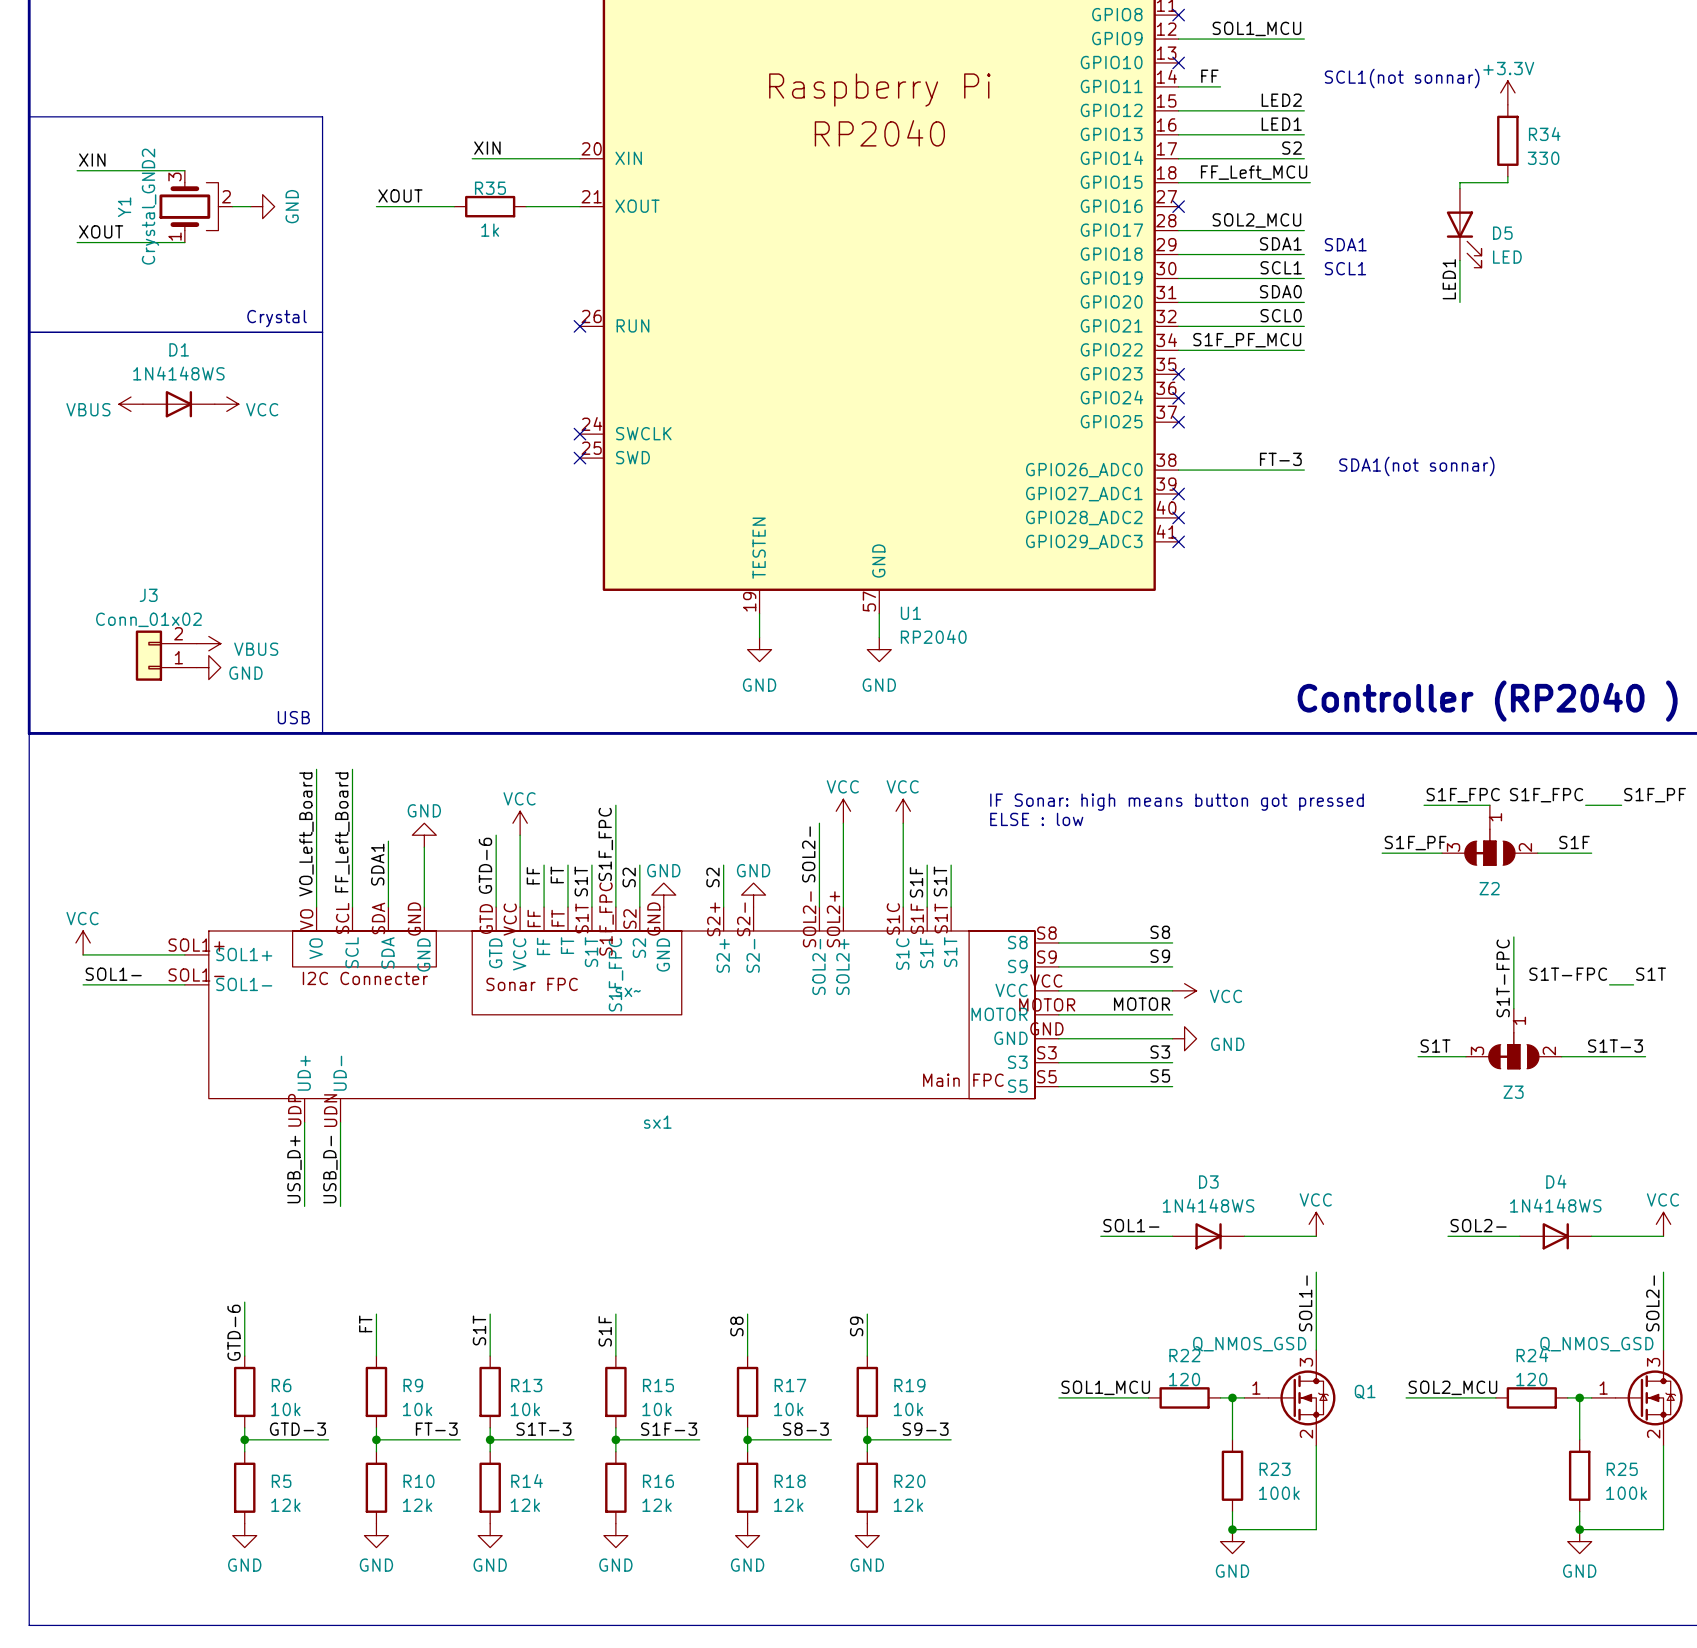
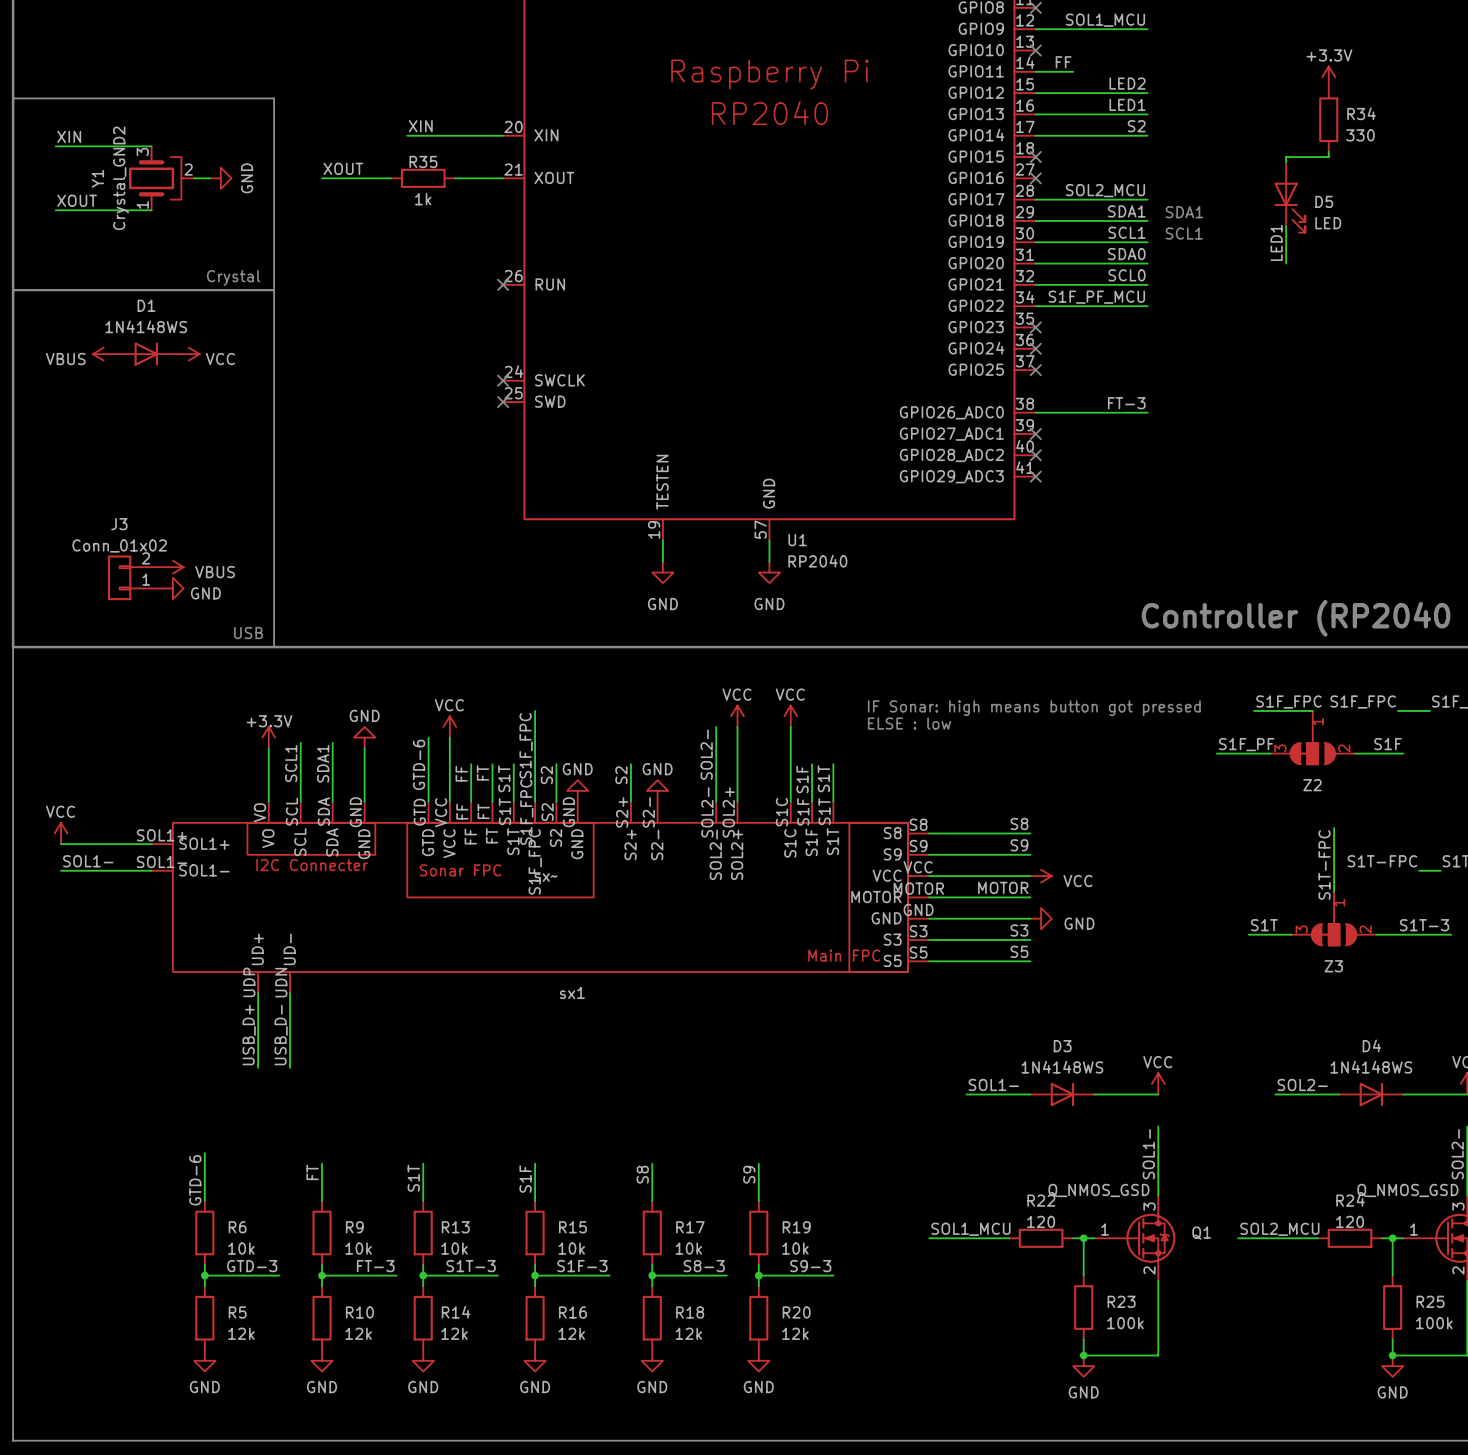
text: SCL1(not sonnar) (1402, 78) -> none
label: FF_Left_MCU (1254, 172) -> none
wire: (1178, 182) (1310, 182) -> none
no-connect mark: none -> (1035, 157)
text: SDA1(not sonnar) (1416, 466) -> none
wire: (316, 769) (316, 847) -> none
wire: (352, 769) (352, 841) -> none
label: FF_Left_Board (342, 832) -> none
label: VO_Left_Board (306, 834) -> none
power symbol: none -> +3.3V (268, 737)
label: none -> SCL1 (291, 763)

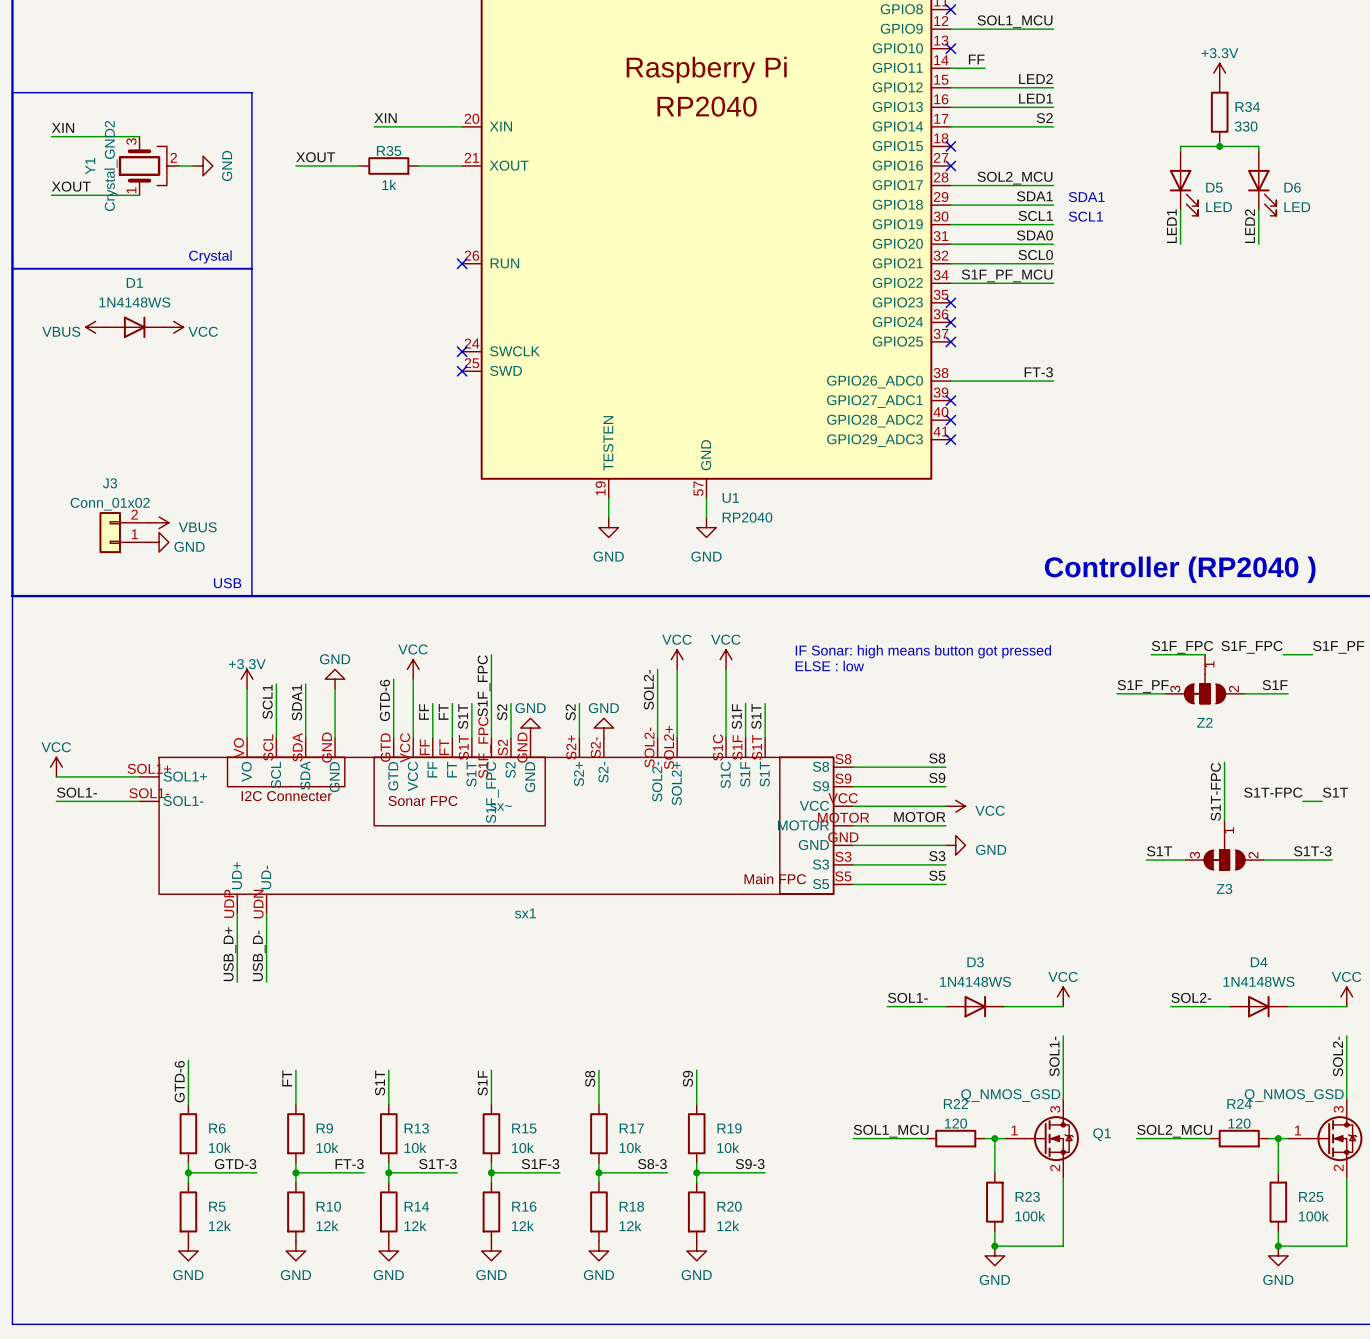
wire: none -> (1219, 146) (1258, 146) (1258, 151)
junction: none -> (1219, 146)
D6: none -> LED (1262, 183)
wire: none -> (1258, 209) (1258, 244)
label: none -> LED2 (1249, 226)

